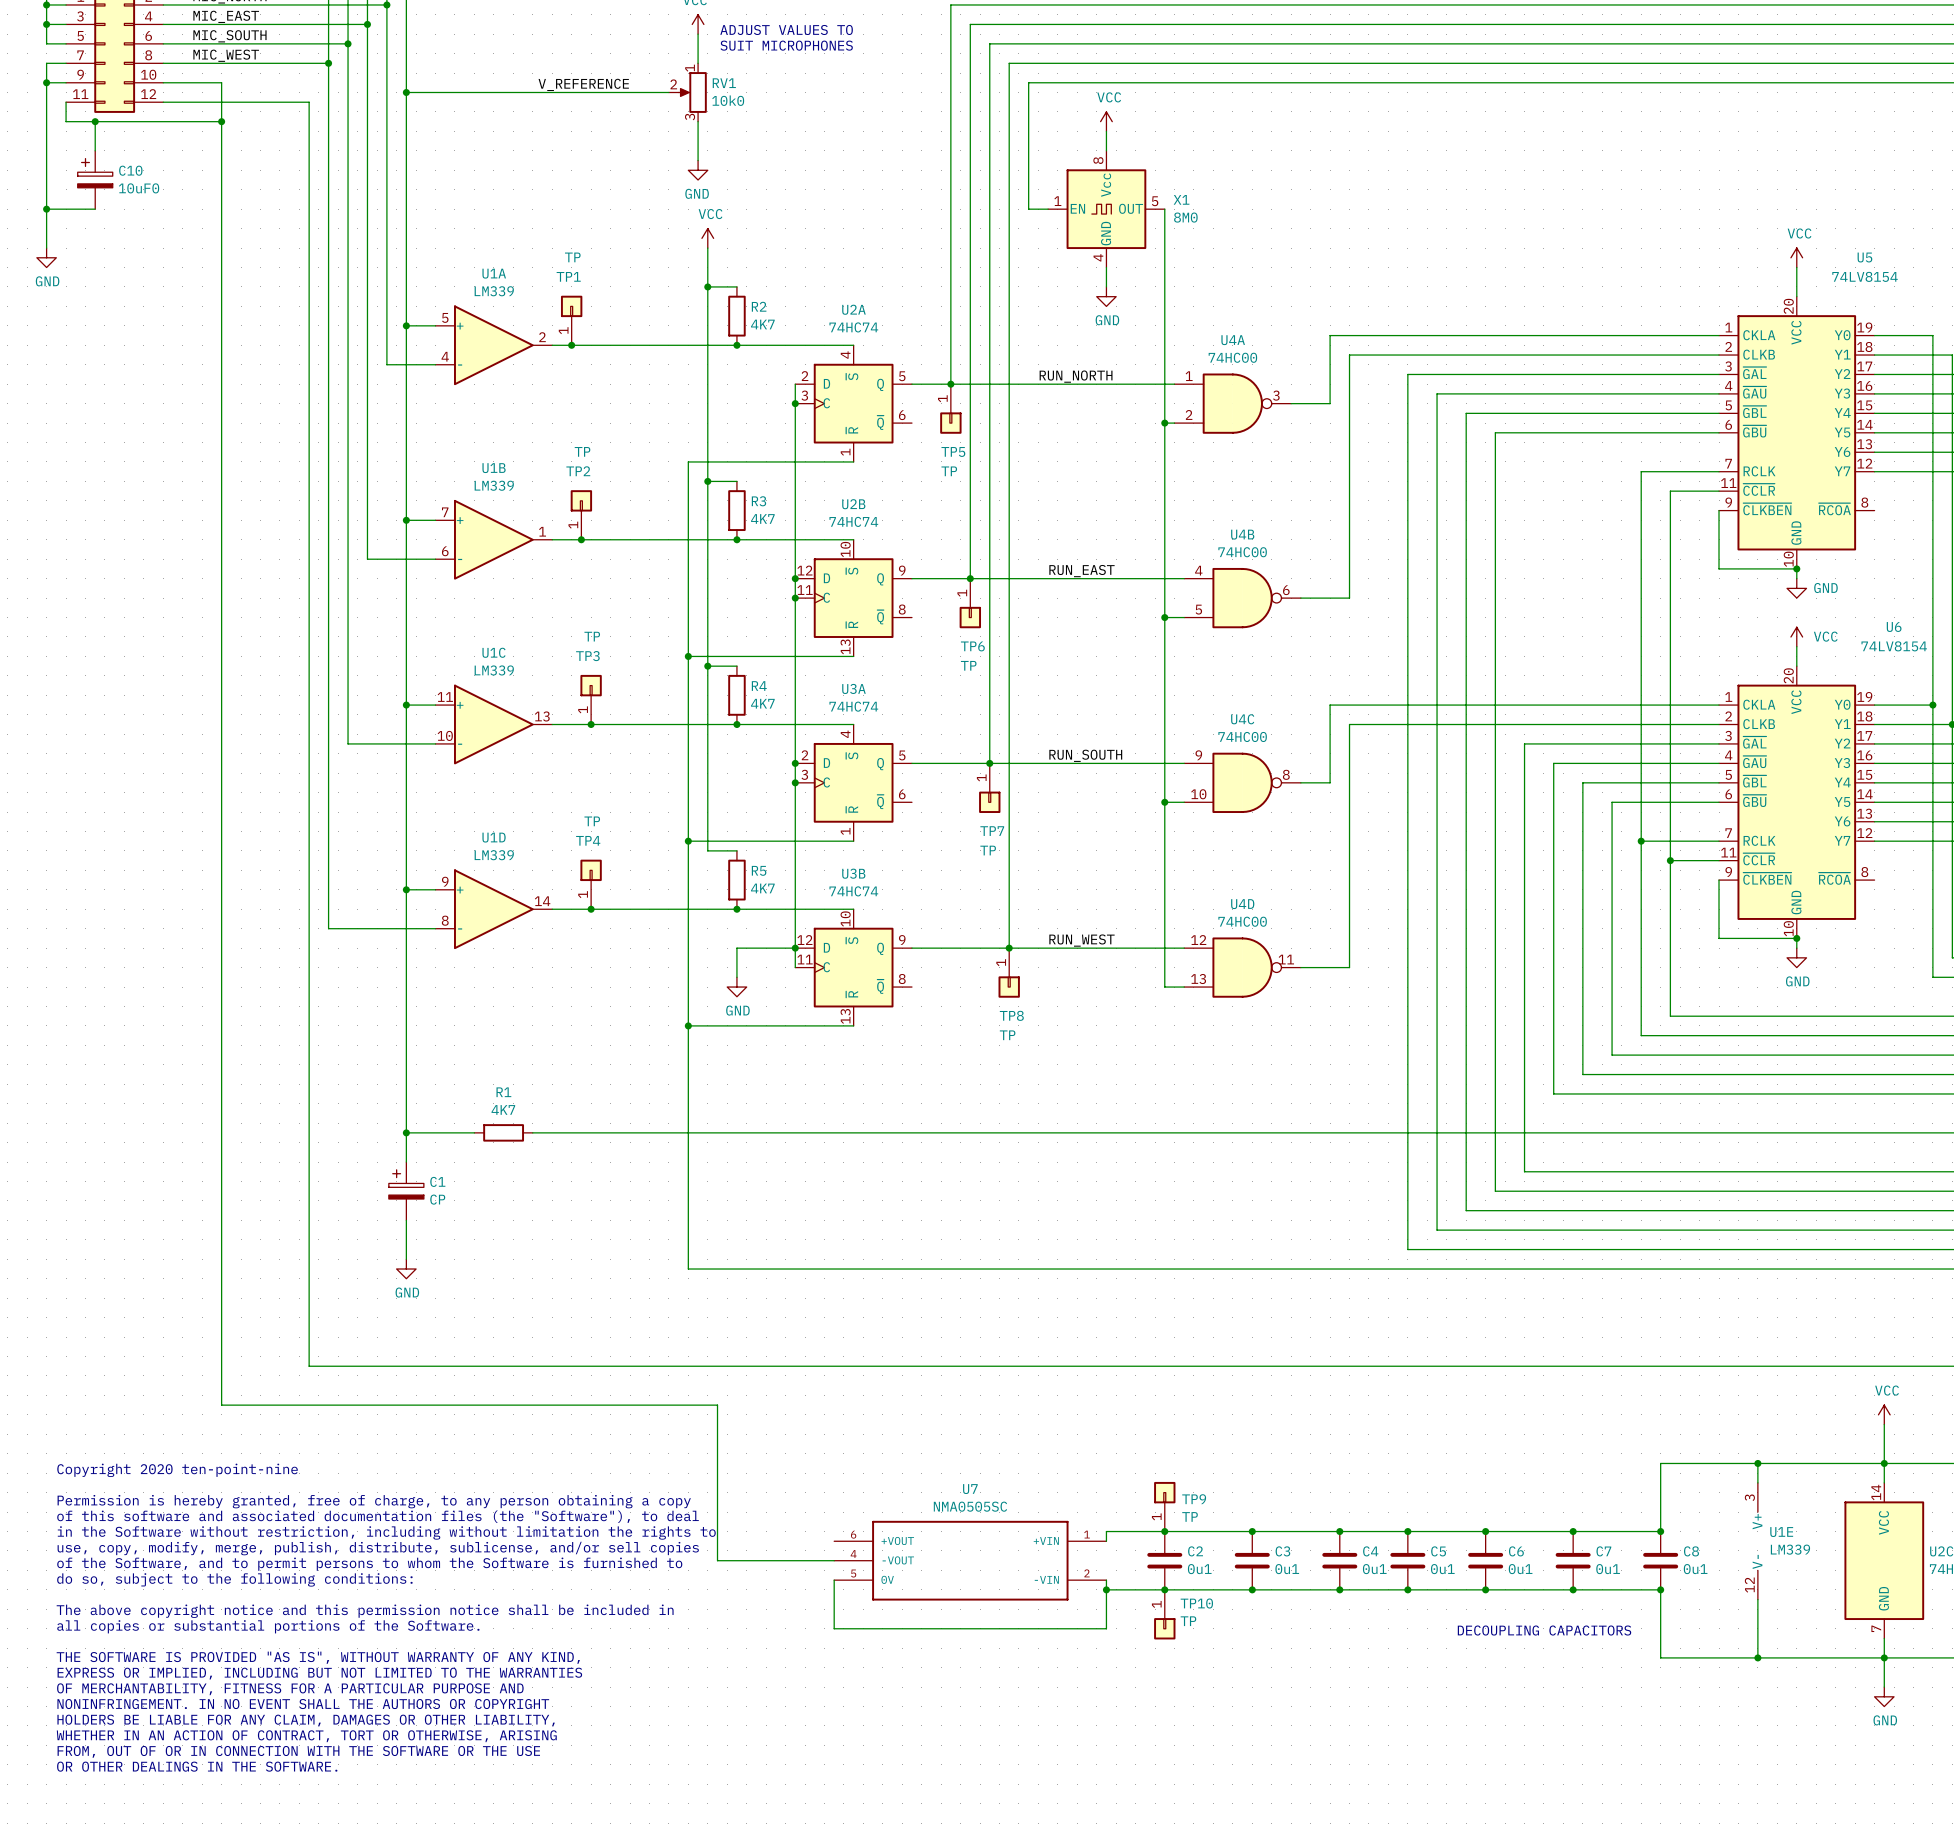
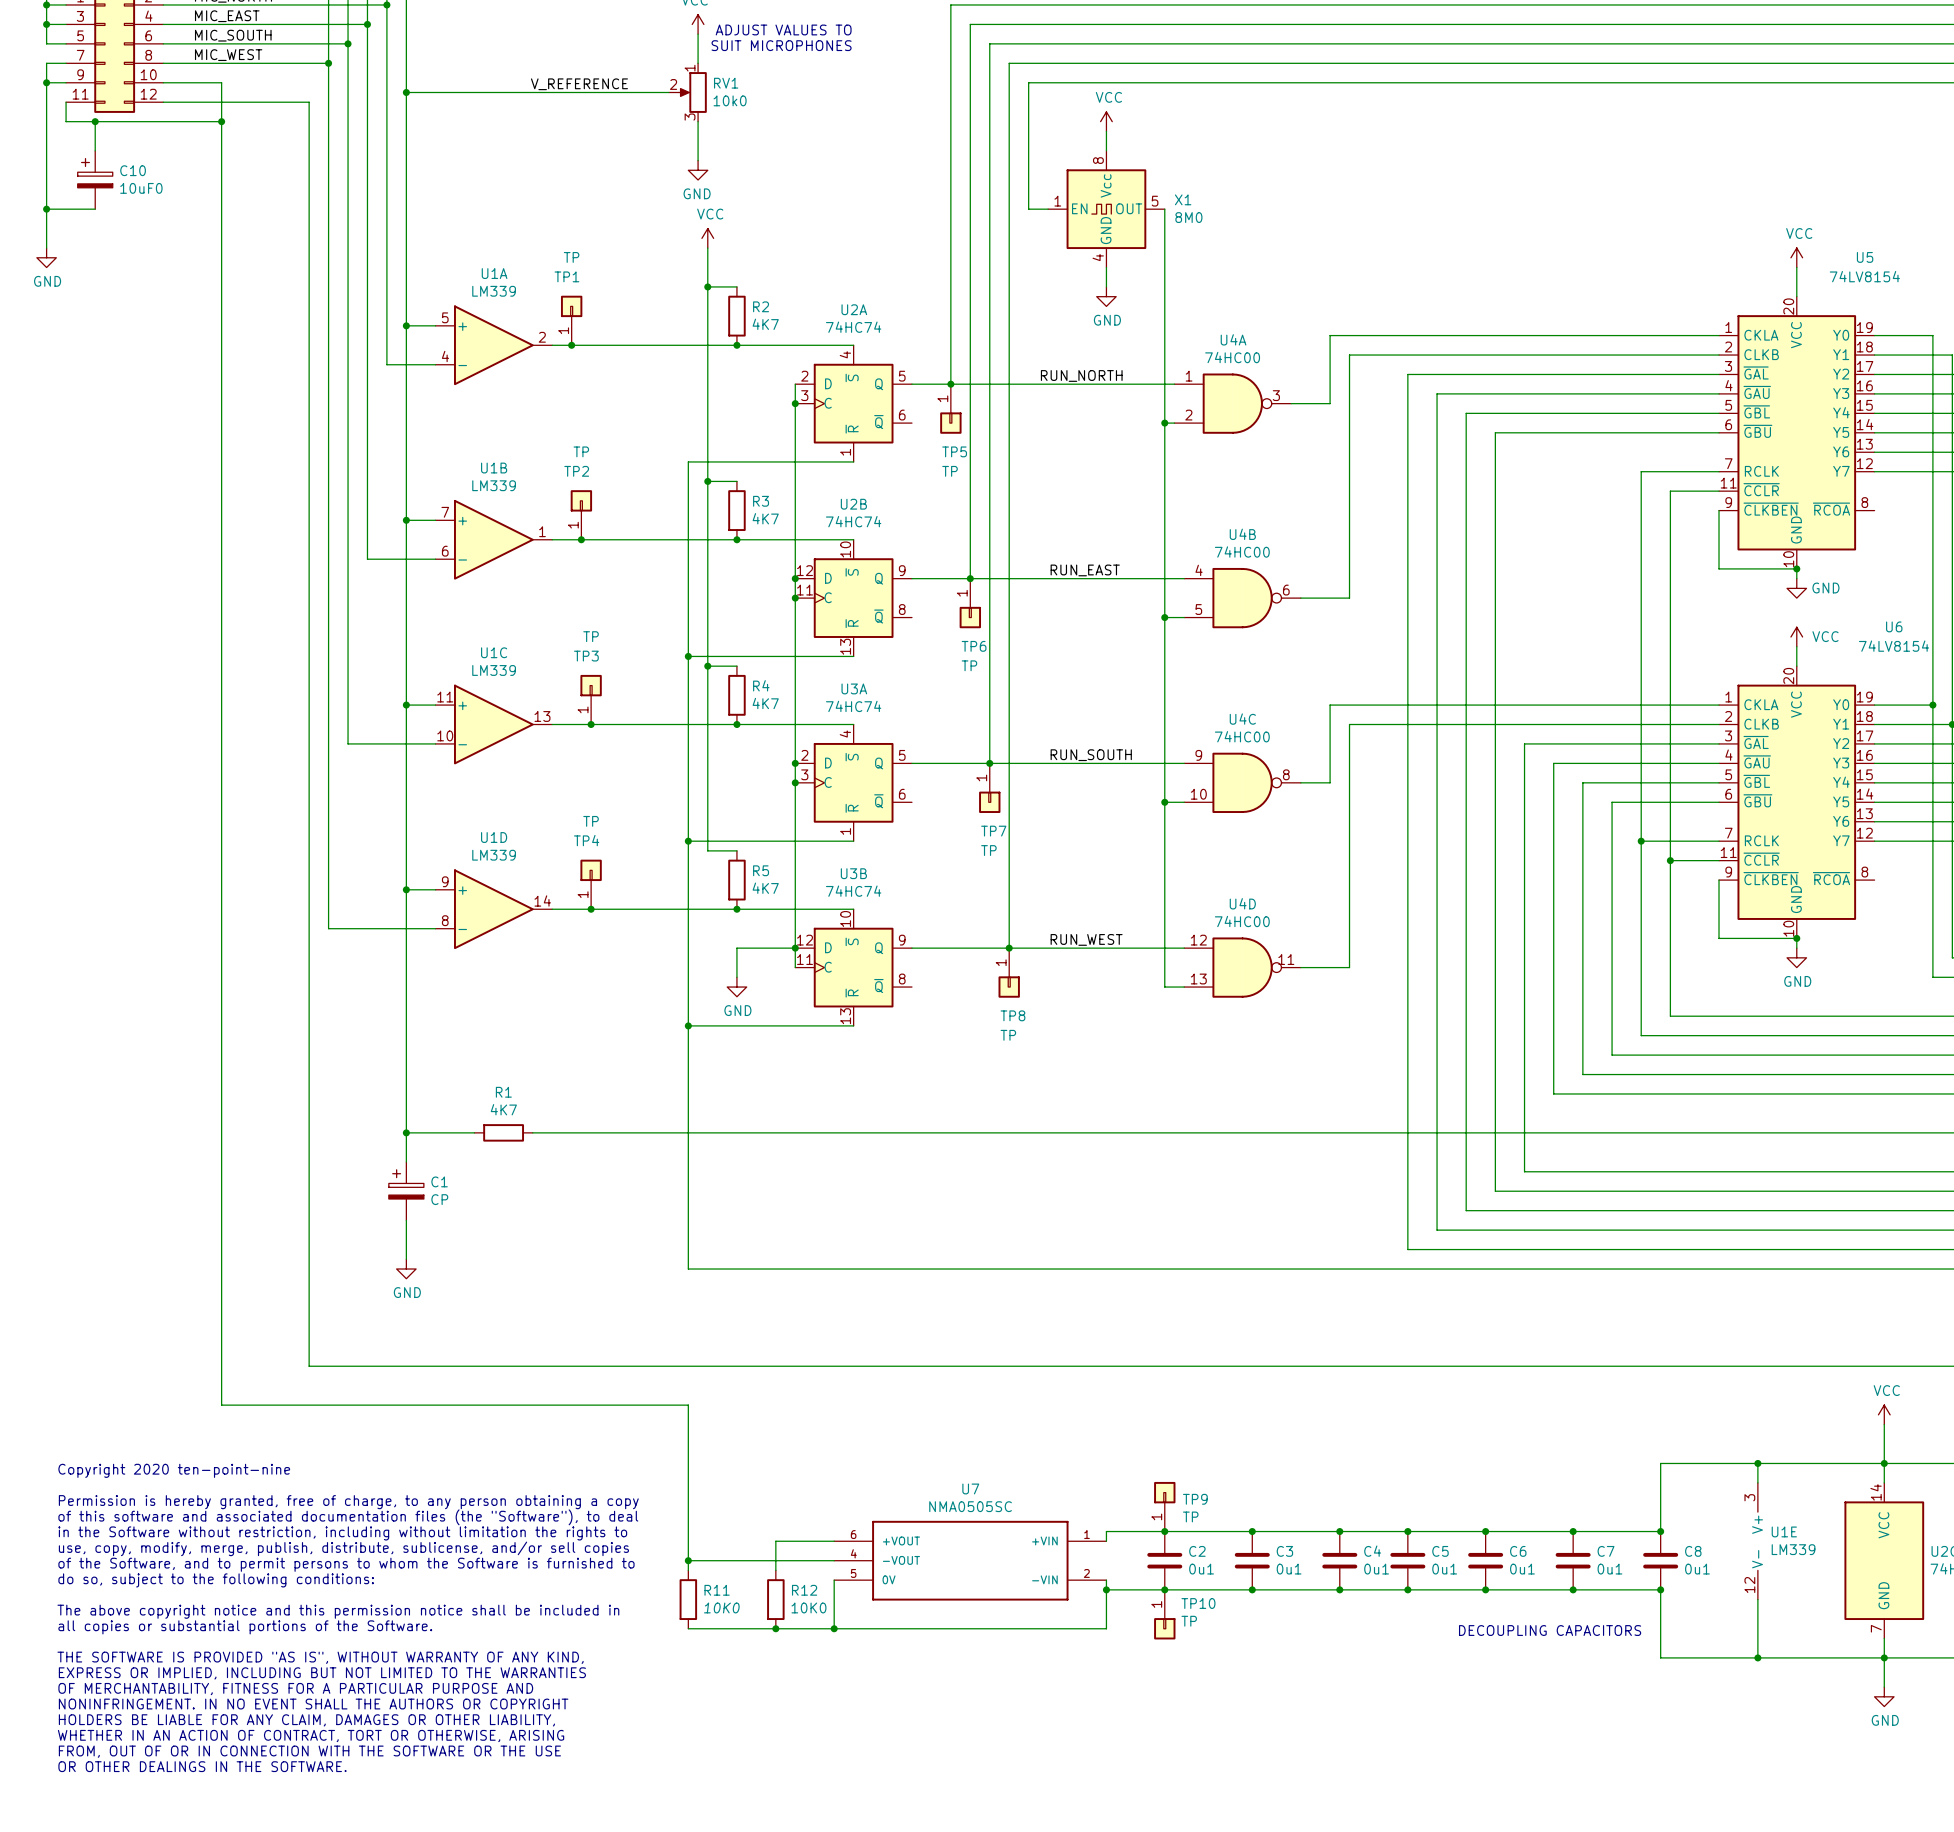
wire: (688, 1405) (717, 1405) (717, 1560) -> (688, 1405) (688, 1570)
wire: none -> (834, 1541) (775, 1541) (775, 1570)
wire: none -> (688, 1560) (717, 1560)
junction: none -> (688, 1560)
R11: none -> 10K0 (688, 1599)
R12: none -> 10K0 (775, 1599)
wire: none -> (688, 1628) (834, 1628)
junction: none -> (775, 1628)
junction: none -> (834, 1628)

